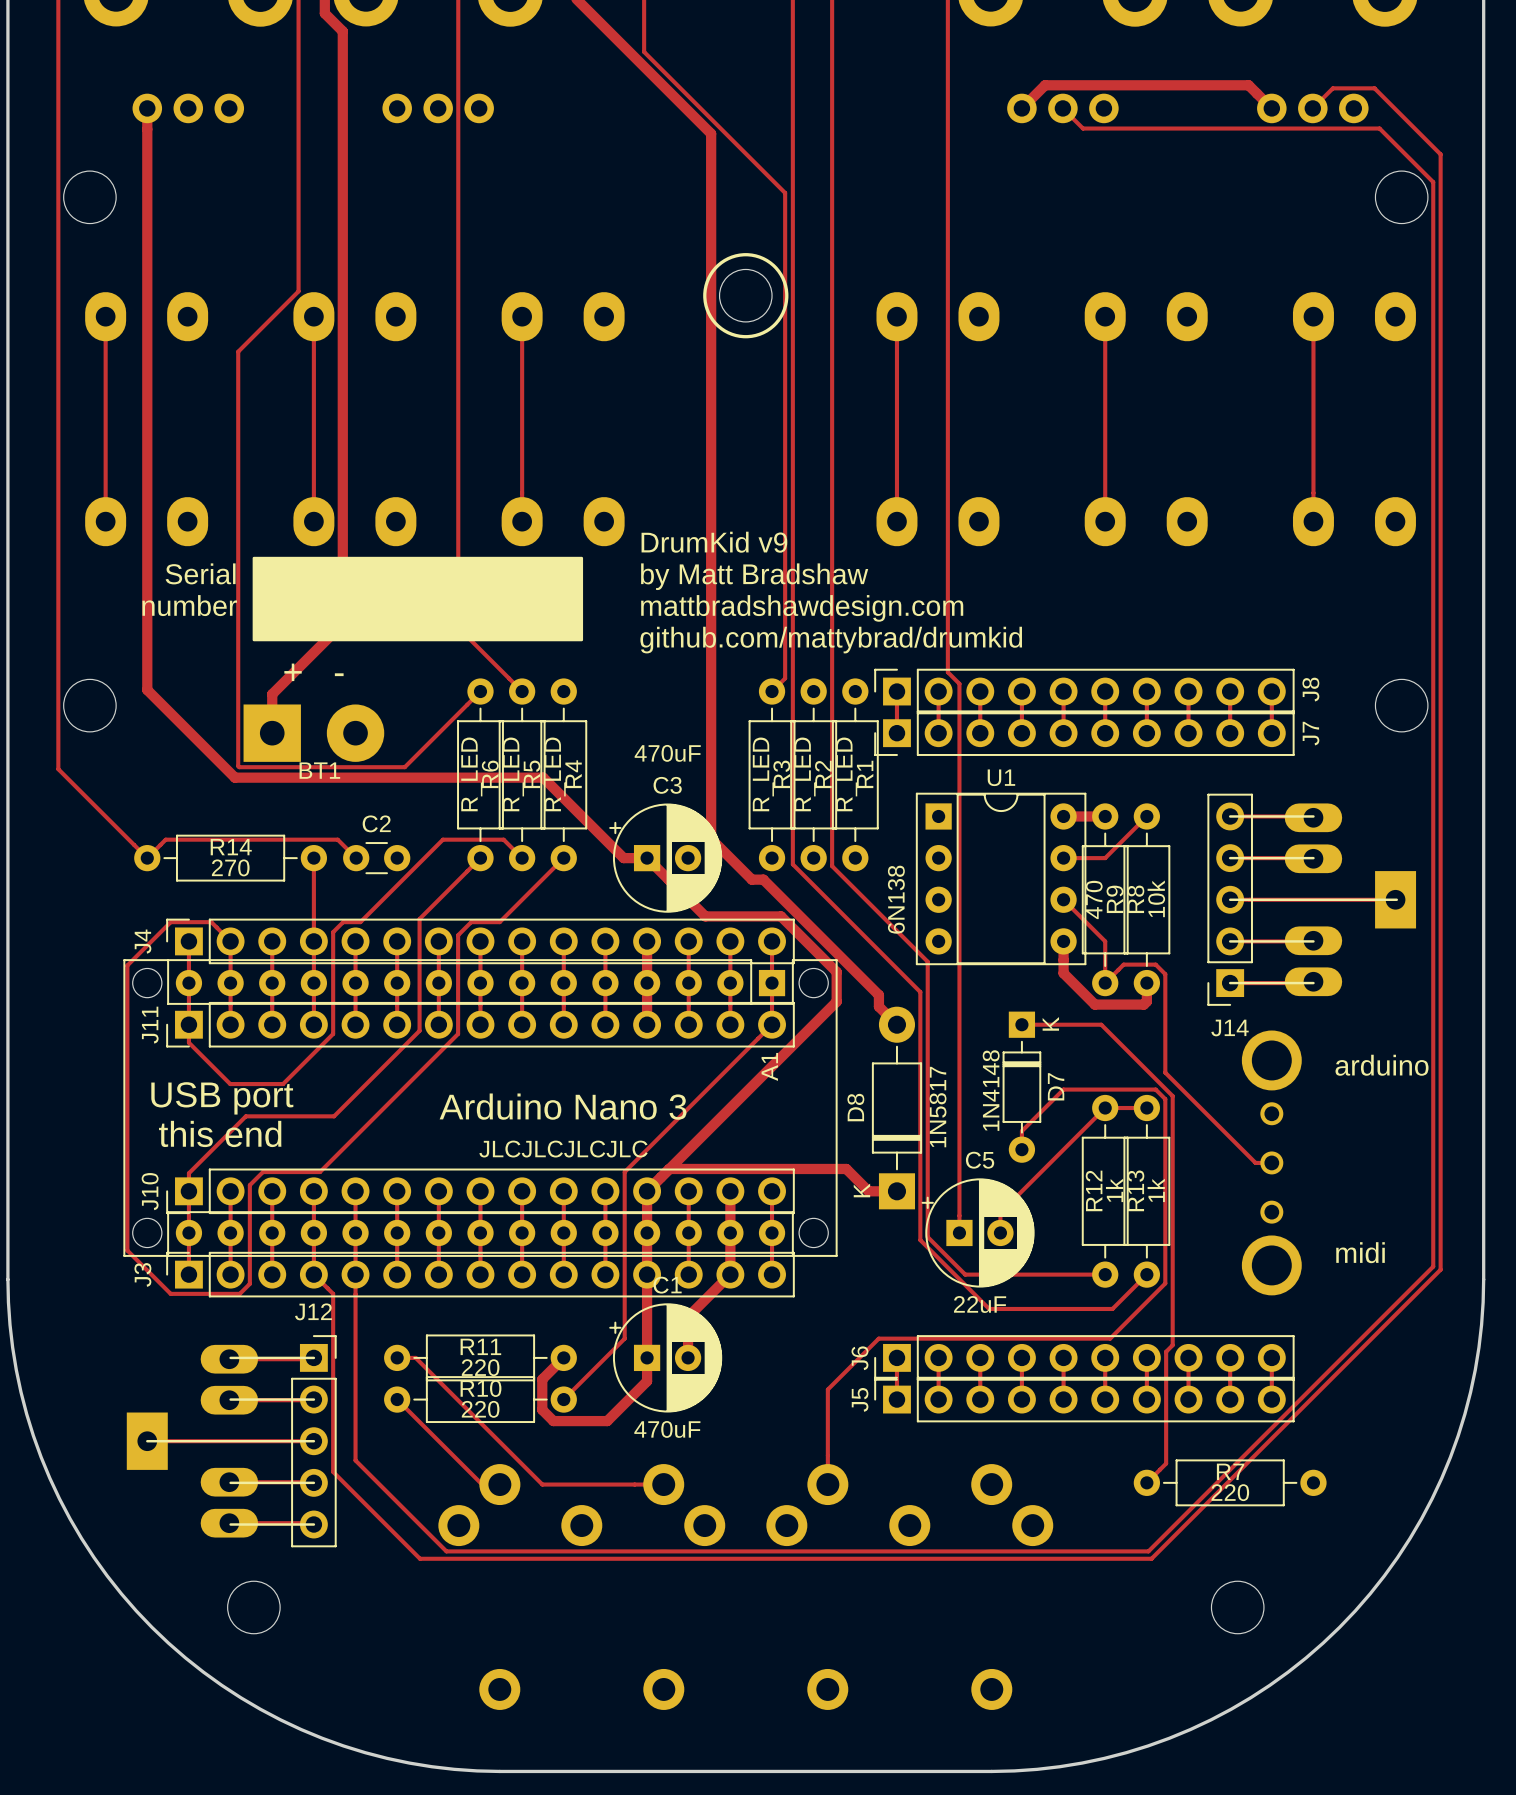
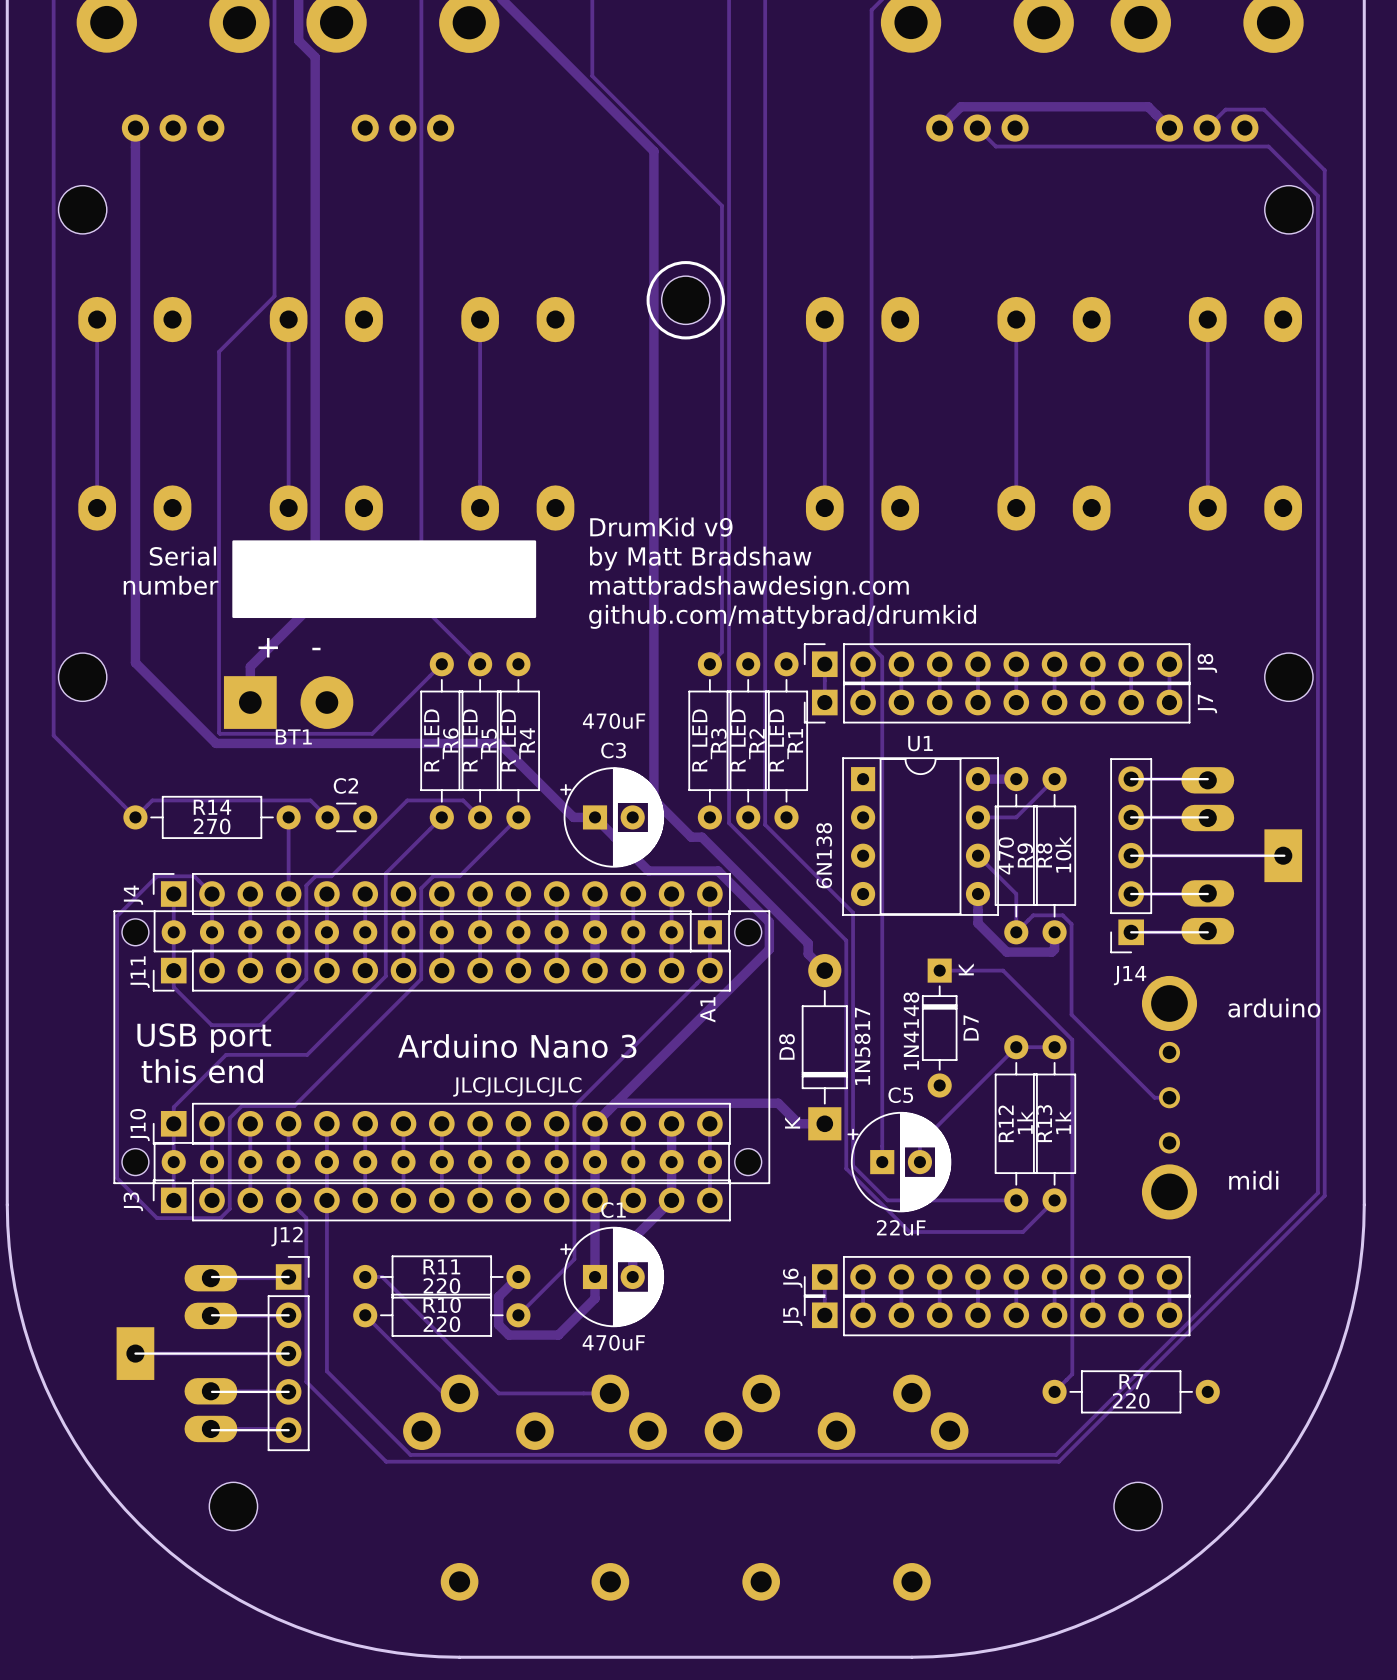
track: (1090, 1024) (1101, 1024) (1172, 1096) (1172, 1345) (1166, 1351) -> (1071, 1039) (1072, 1271)
track: (1155, 1089) (1063, 1089) (1021, 1131) (1021, 1149) -> (1062, 1030) (1003, 970)
track: (1165, 1099) (1165, 1283) (1110, 1338) (878, 1338) (827, 1389) (827, 1484) -> none

